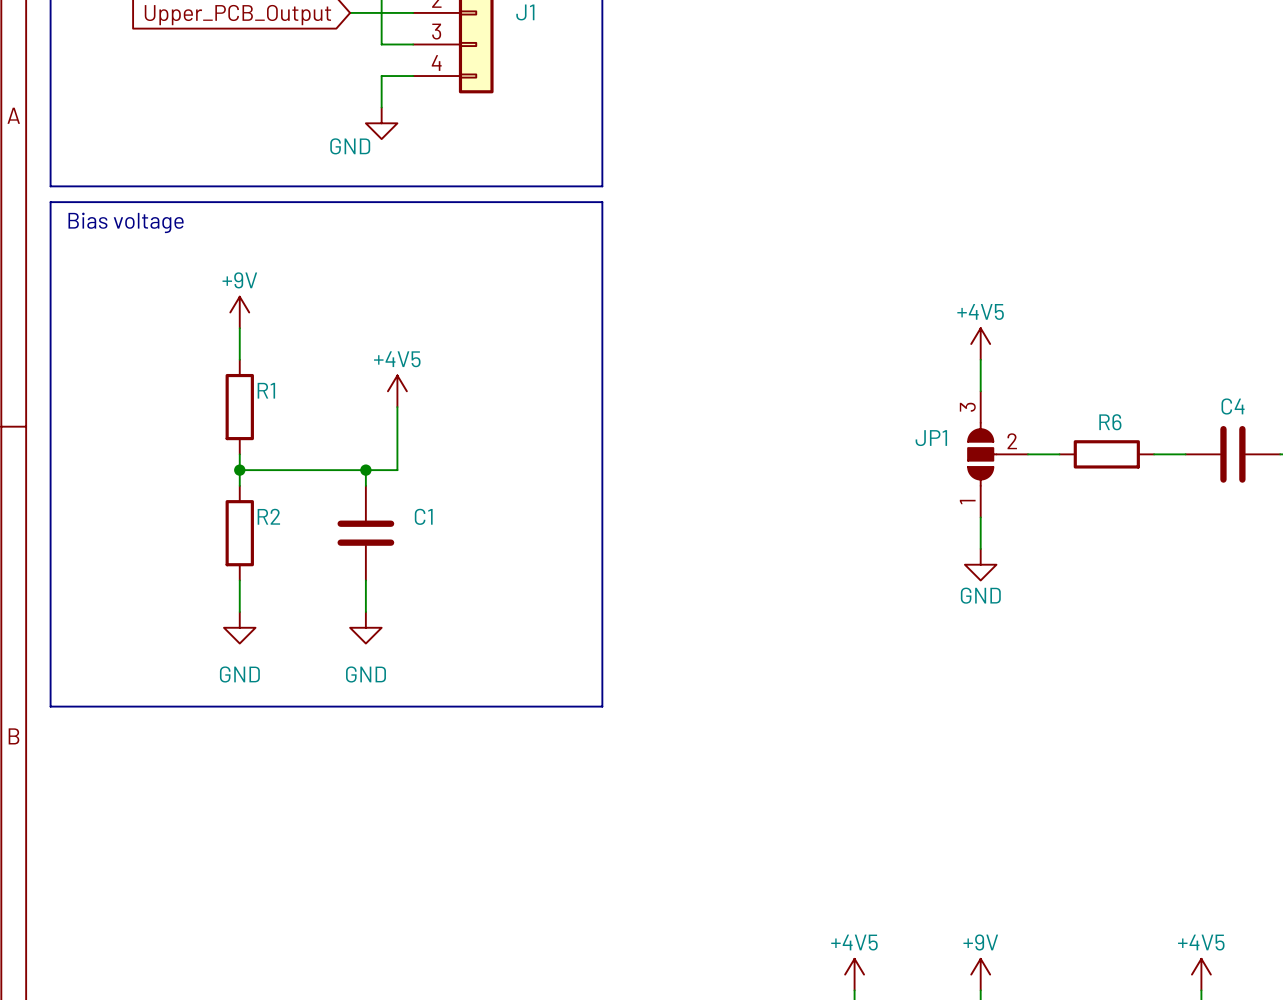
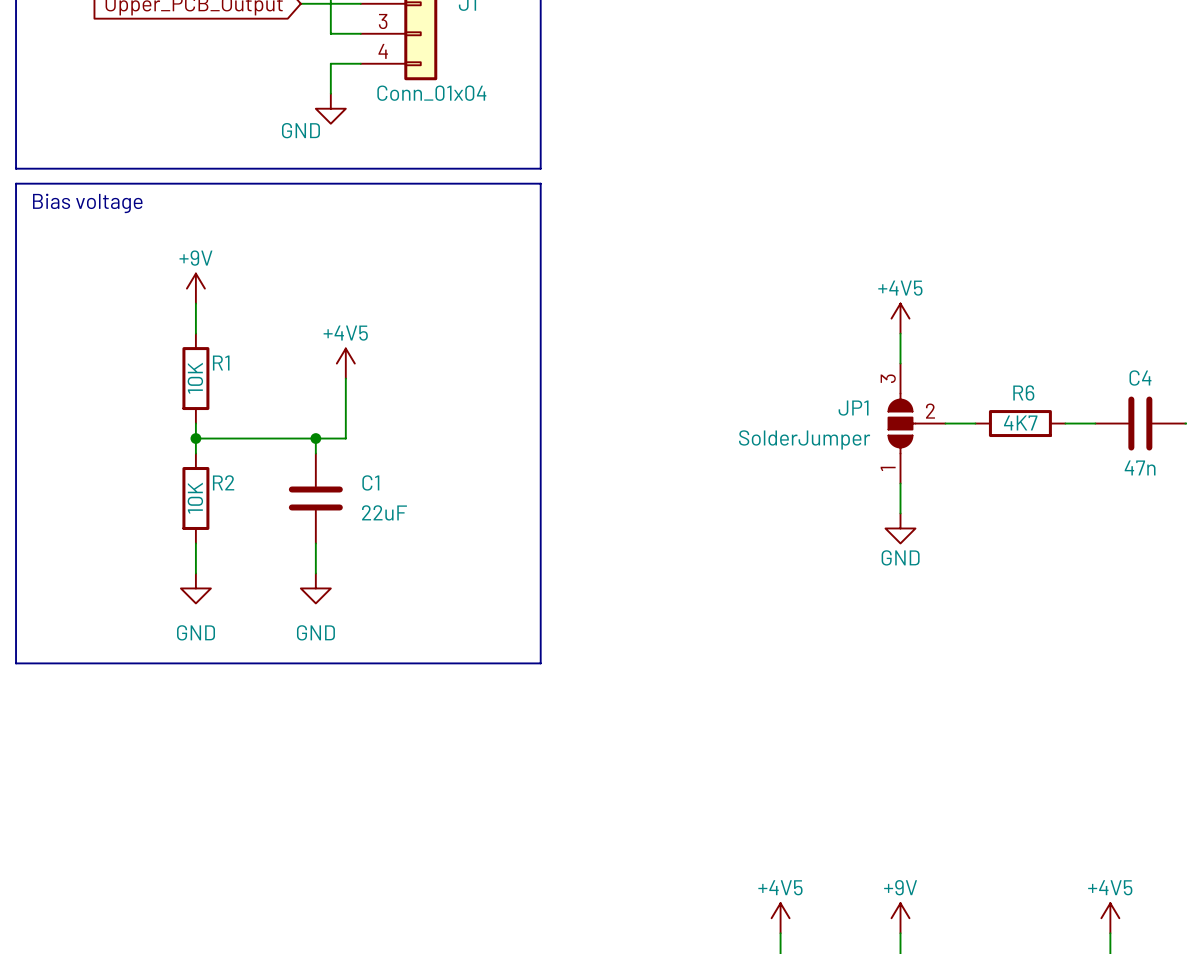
J1 value: none -> Conn_01x04 (431, 93)
R1 value: none -> 10K (195, 378)
R6 value: none -> 4K7 (1020, 422)
JP1 value: none -> SolderJumper (804, 439)
C4 value: none -> 47n (1140, 467)
R2 value: none -> 10K (195, 498)
C1 value: none -> 22uF (384, 512)

